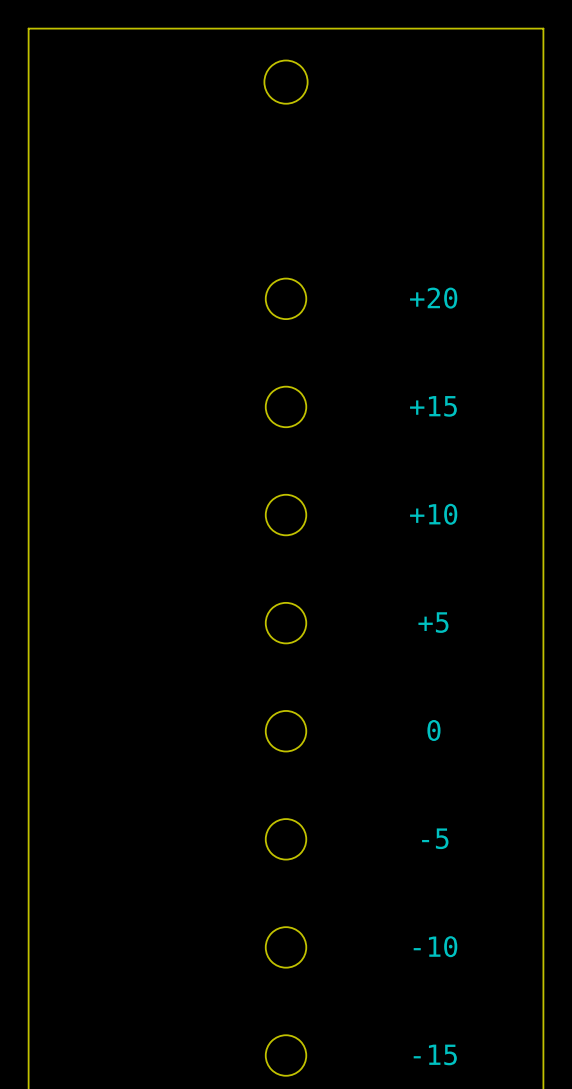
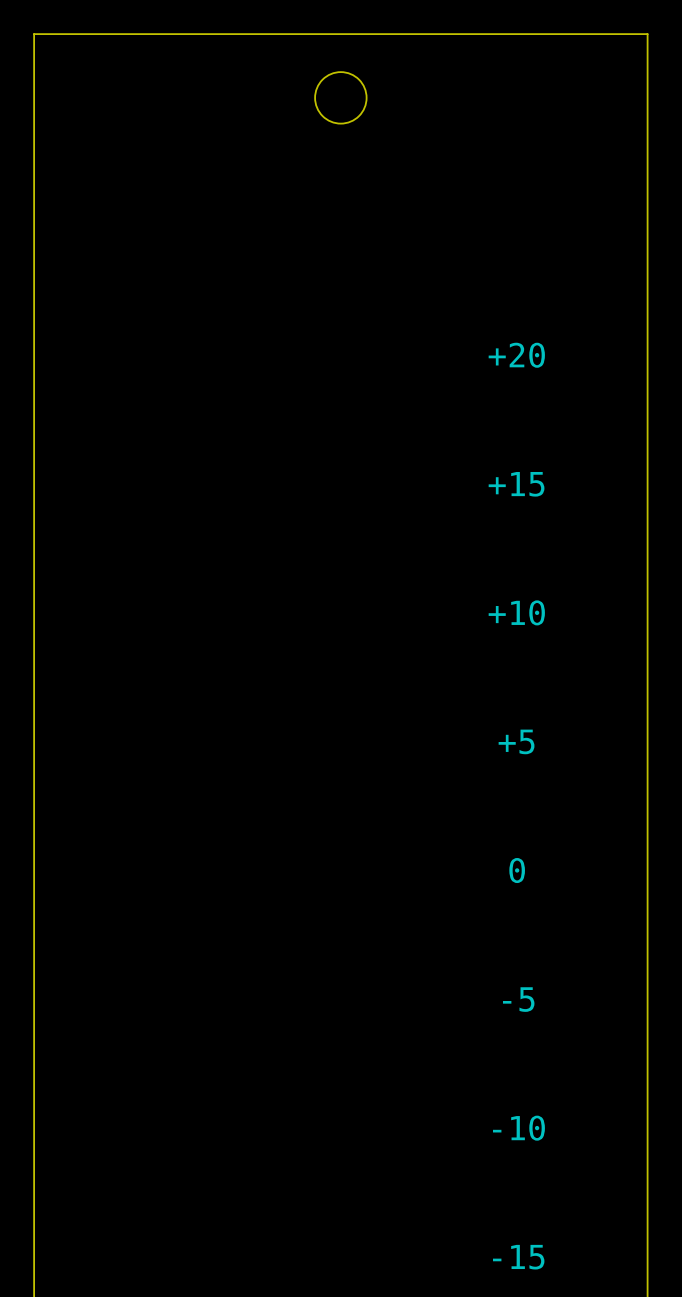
round board edge: [265, 277, 307, 320] -> none
round board edge: [265, 386, 307, 428] -> none
round board edge: [265, 494, 307, 536] -> none
round board edge: [265, 602, 307, 645] -> none
round board edge: [265, 710, 307, 753] -> none
round board edge: [265, 818, 307, 861] -> none
round board edge: [265, 926, 307, 969] -> none
round board edge: [265, 1034, 307, 1077] -> none

